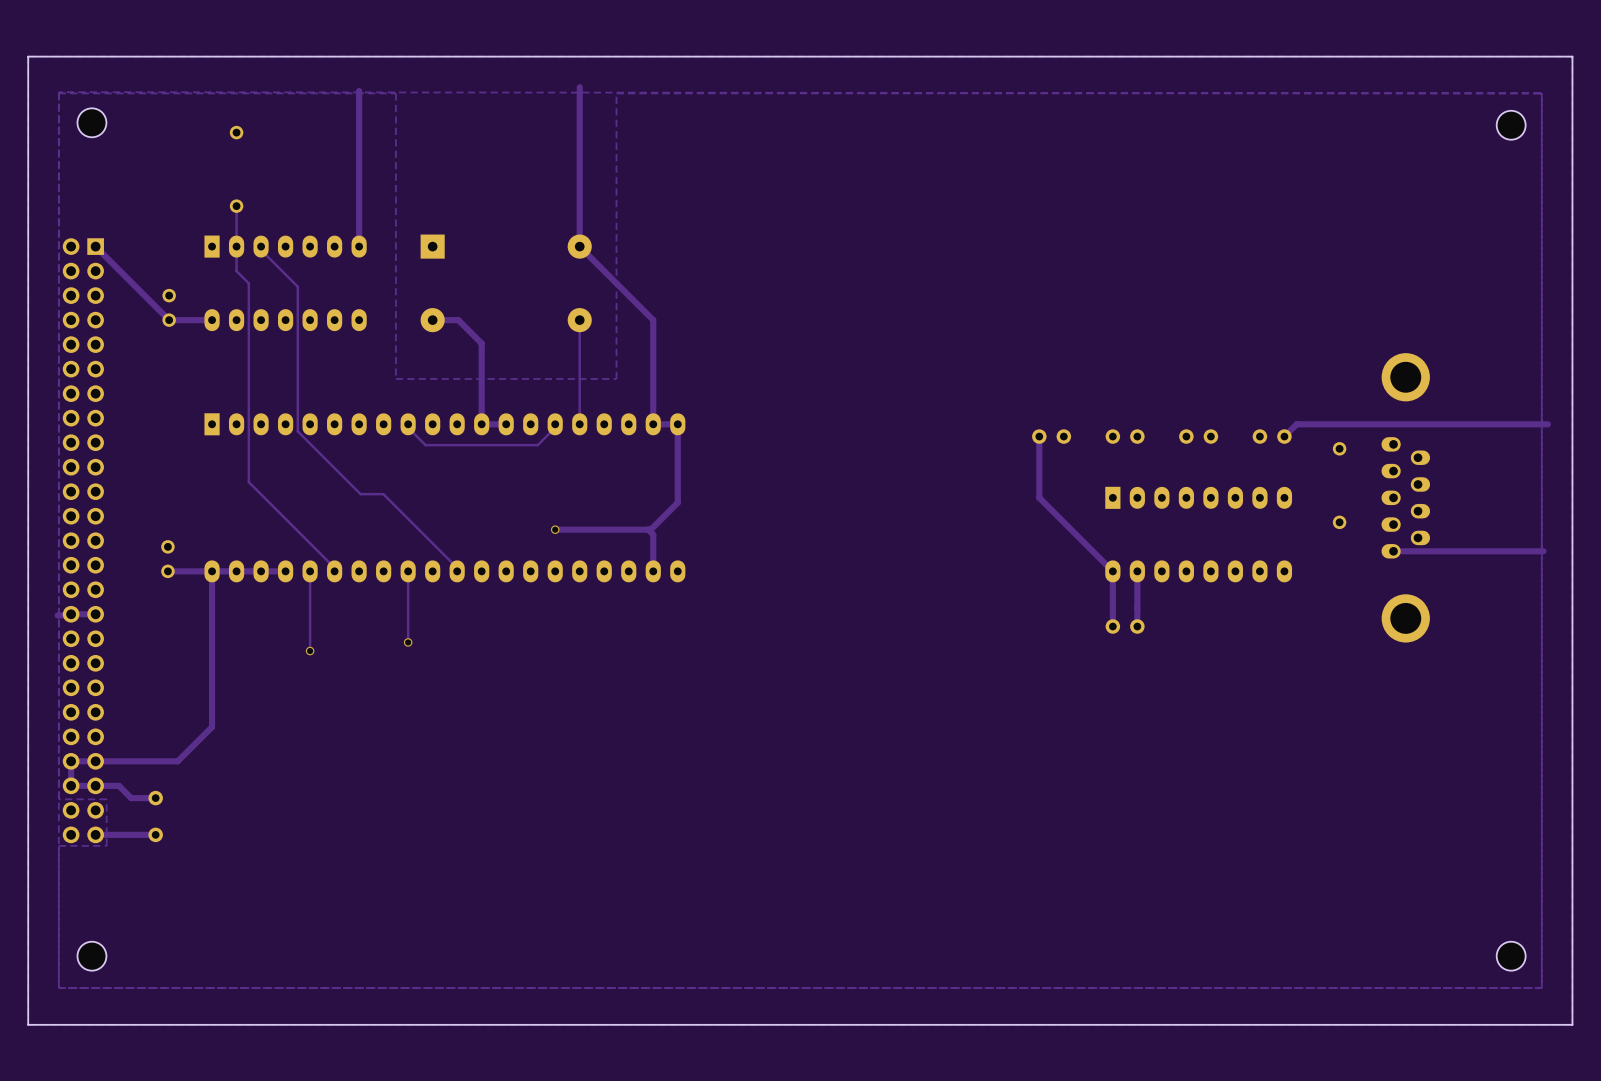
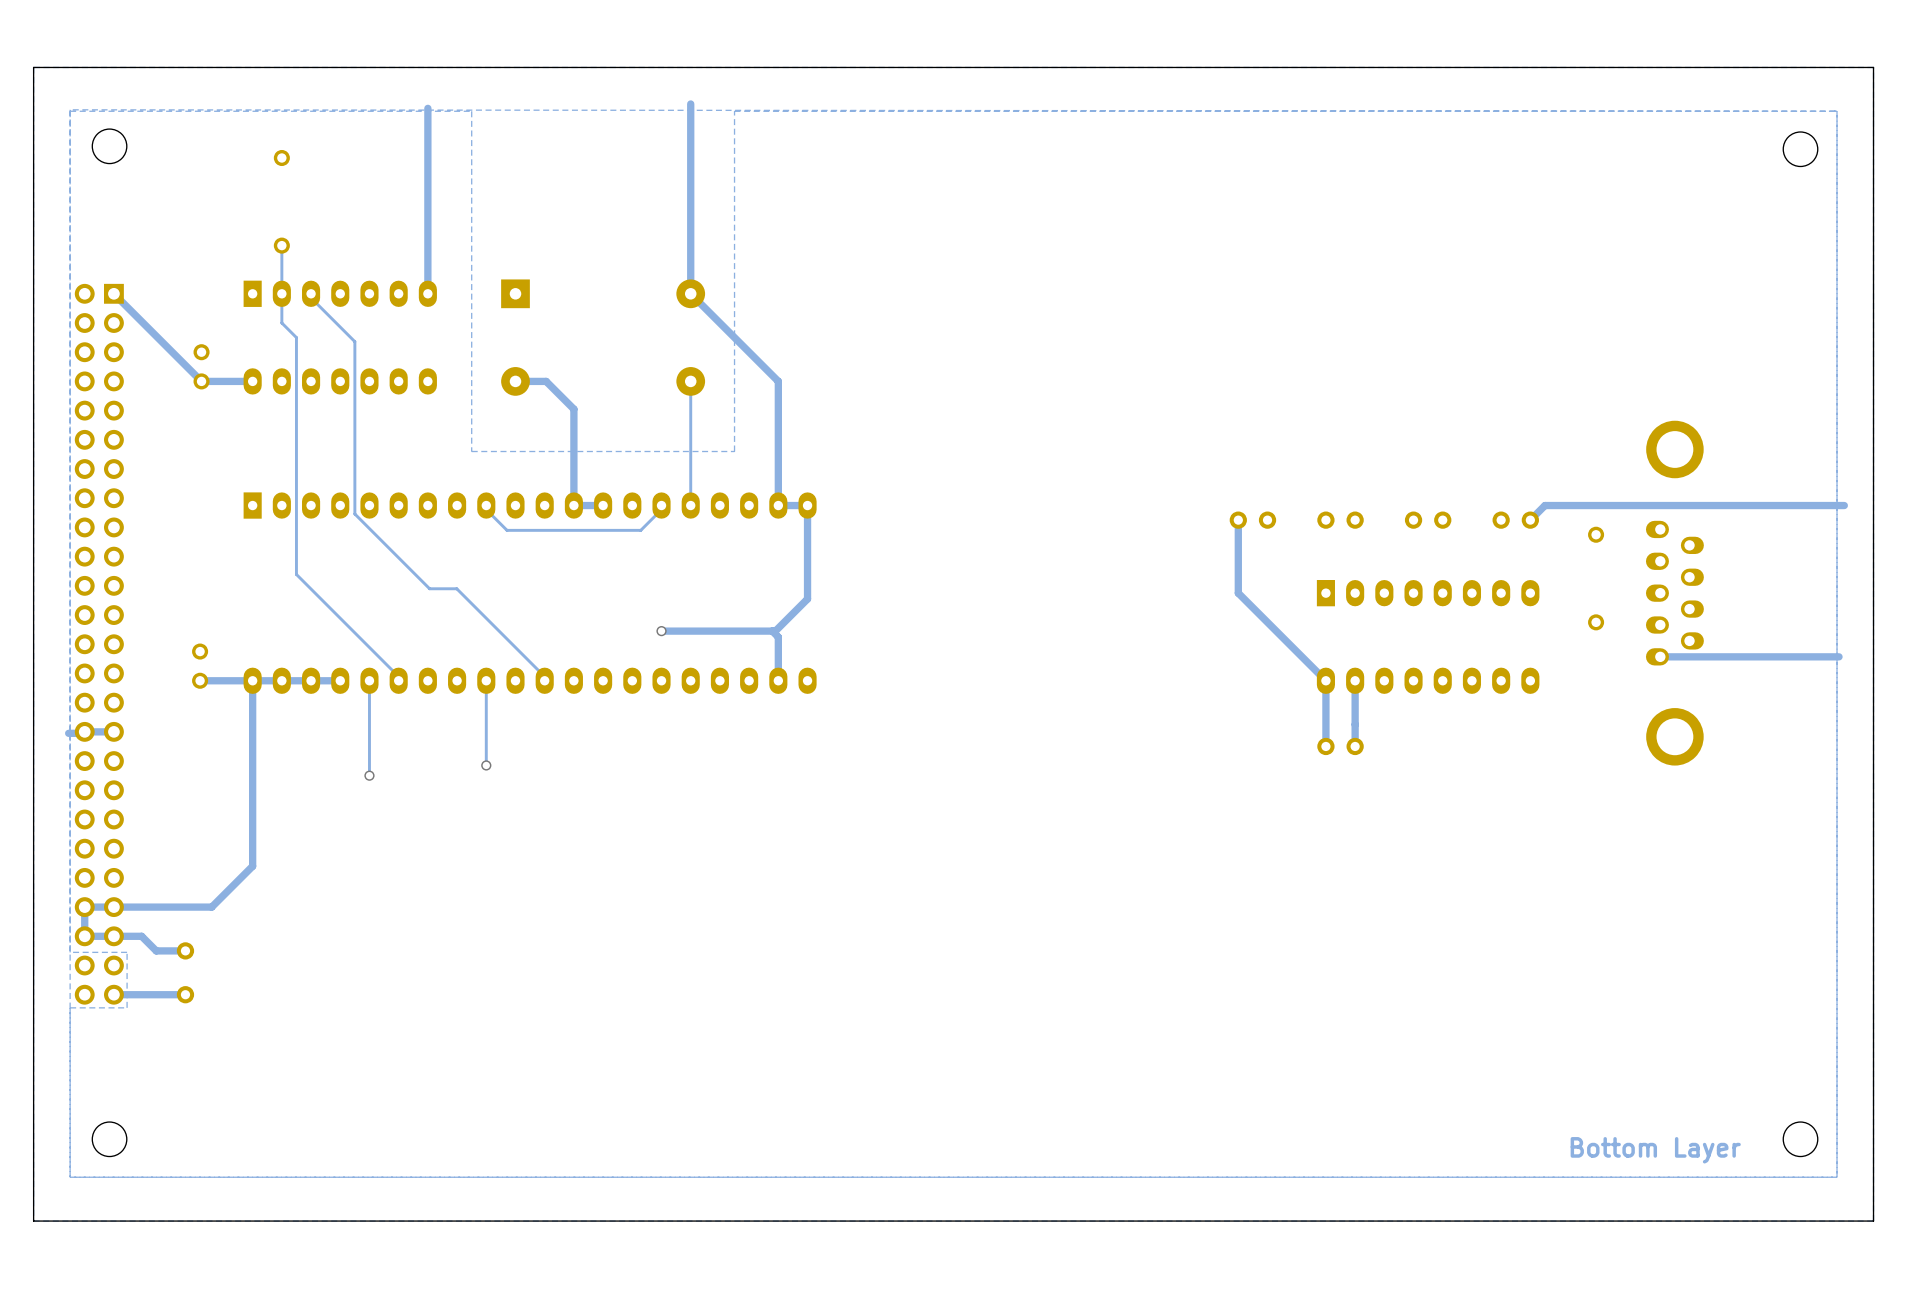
text: none -> Bottom Layer (1655, 1150)

